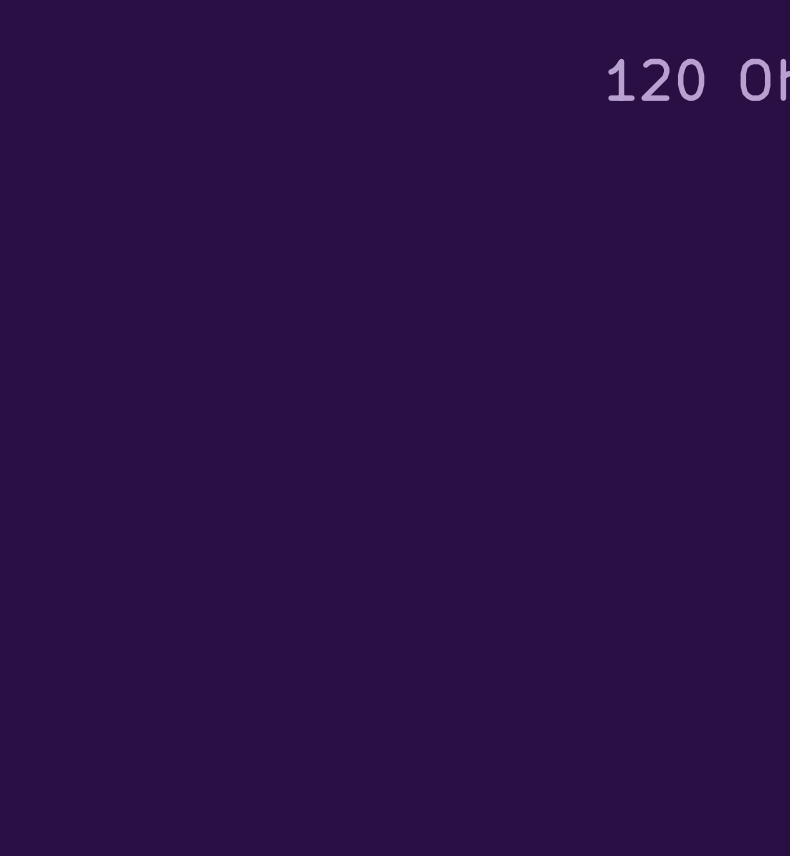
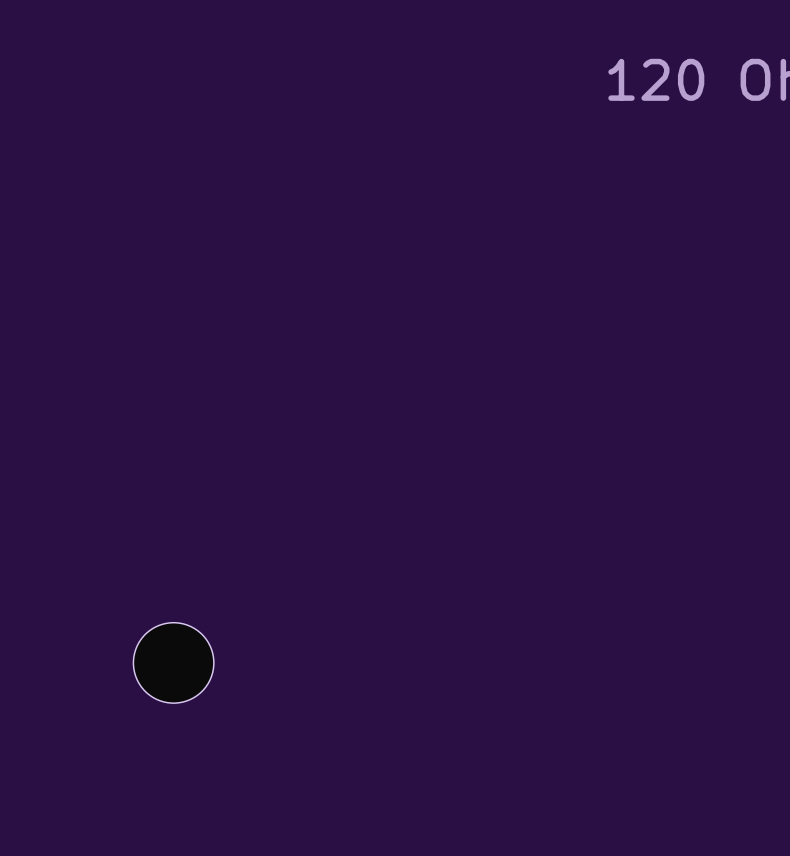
part: none -> (173, 662)

